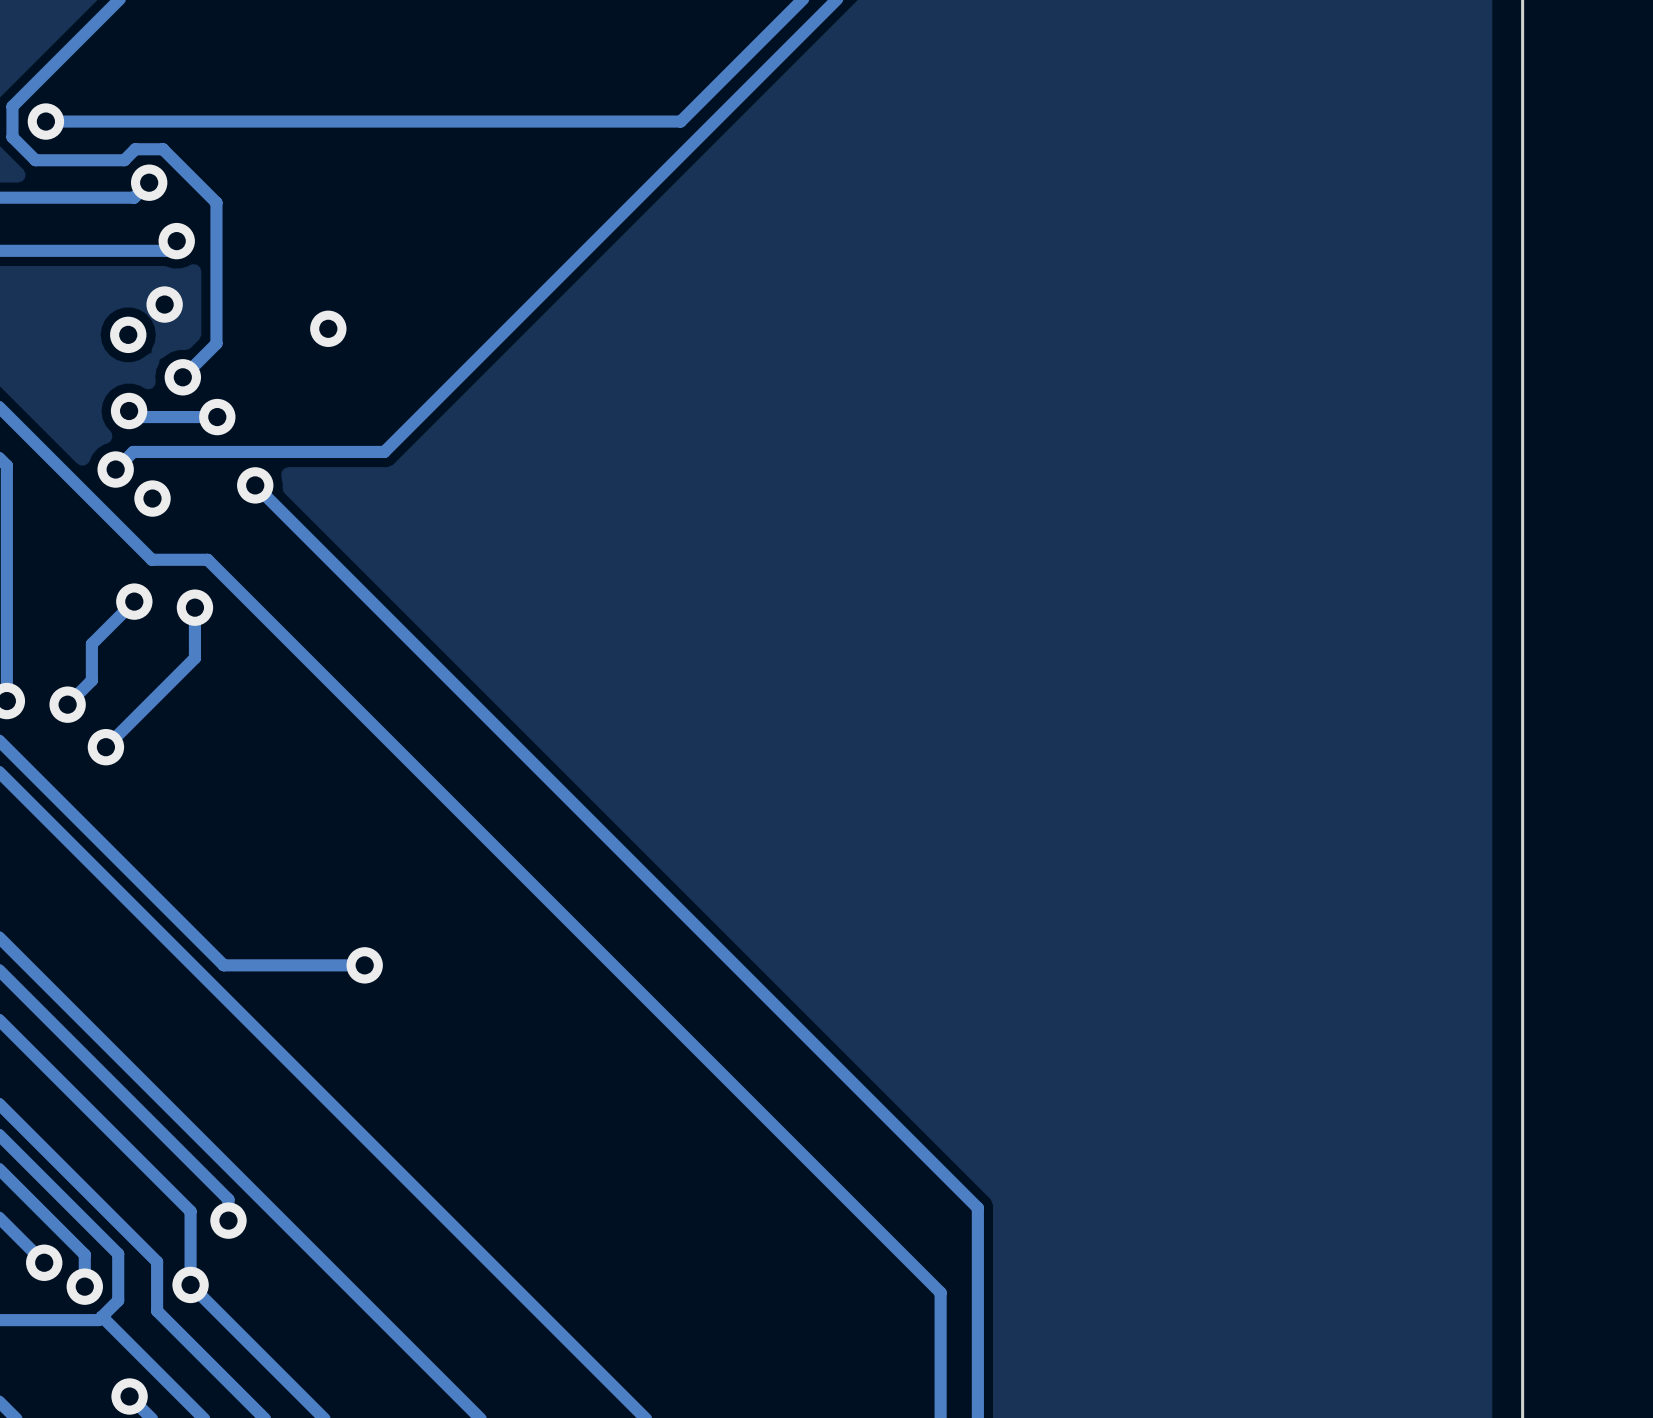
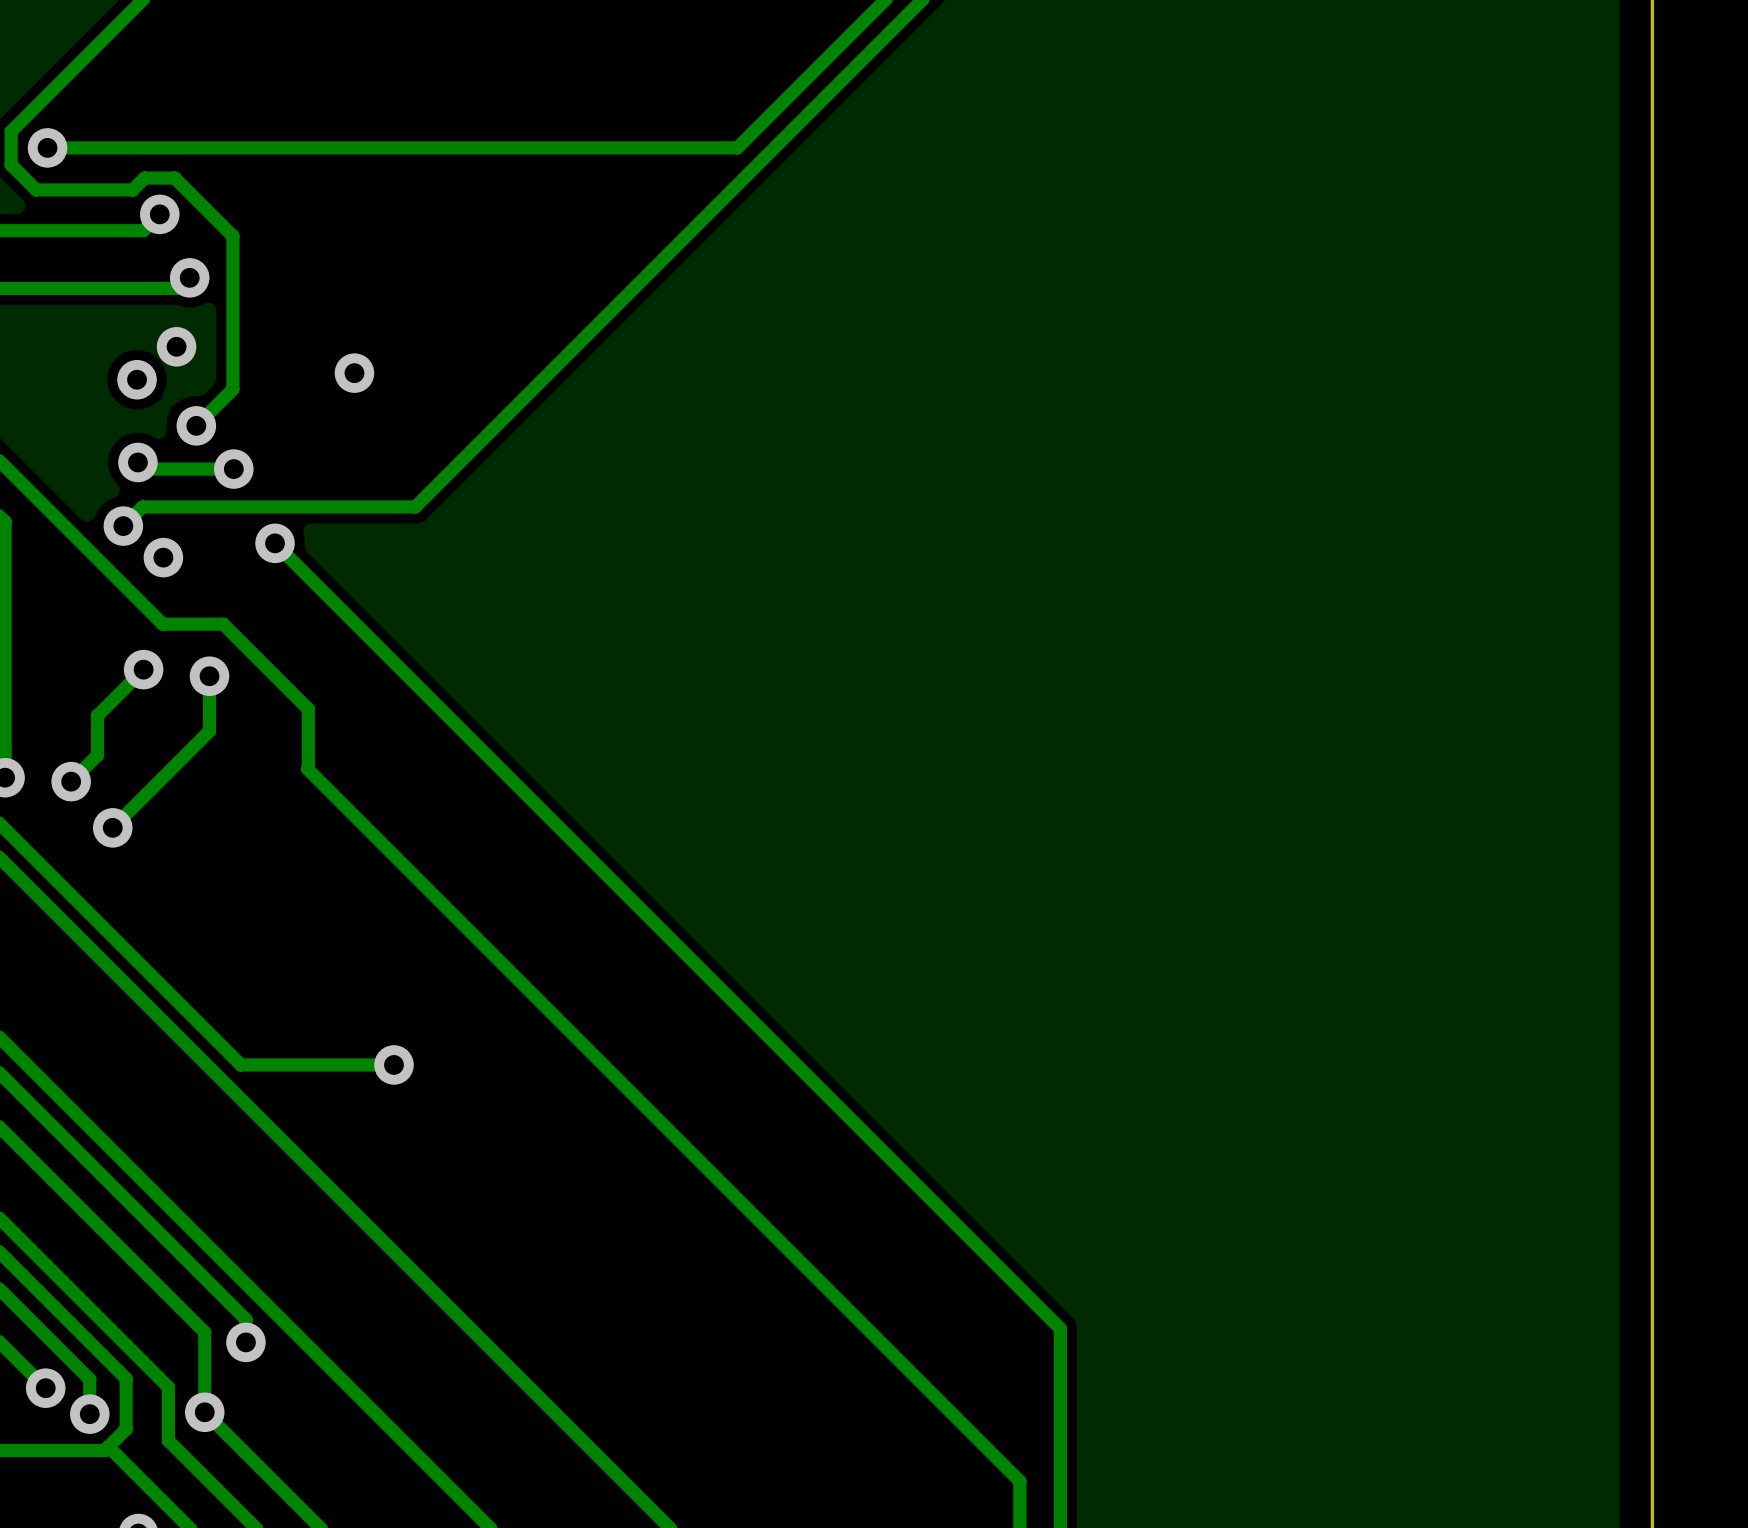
track: (285, 637) (940, 1292) (940, 1348) -> (307, 769) (1019, 1481)
track: none -> (308, 709) (308, 768)

